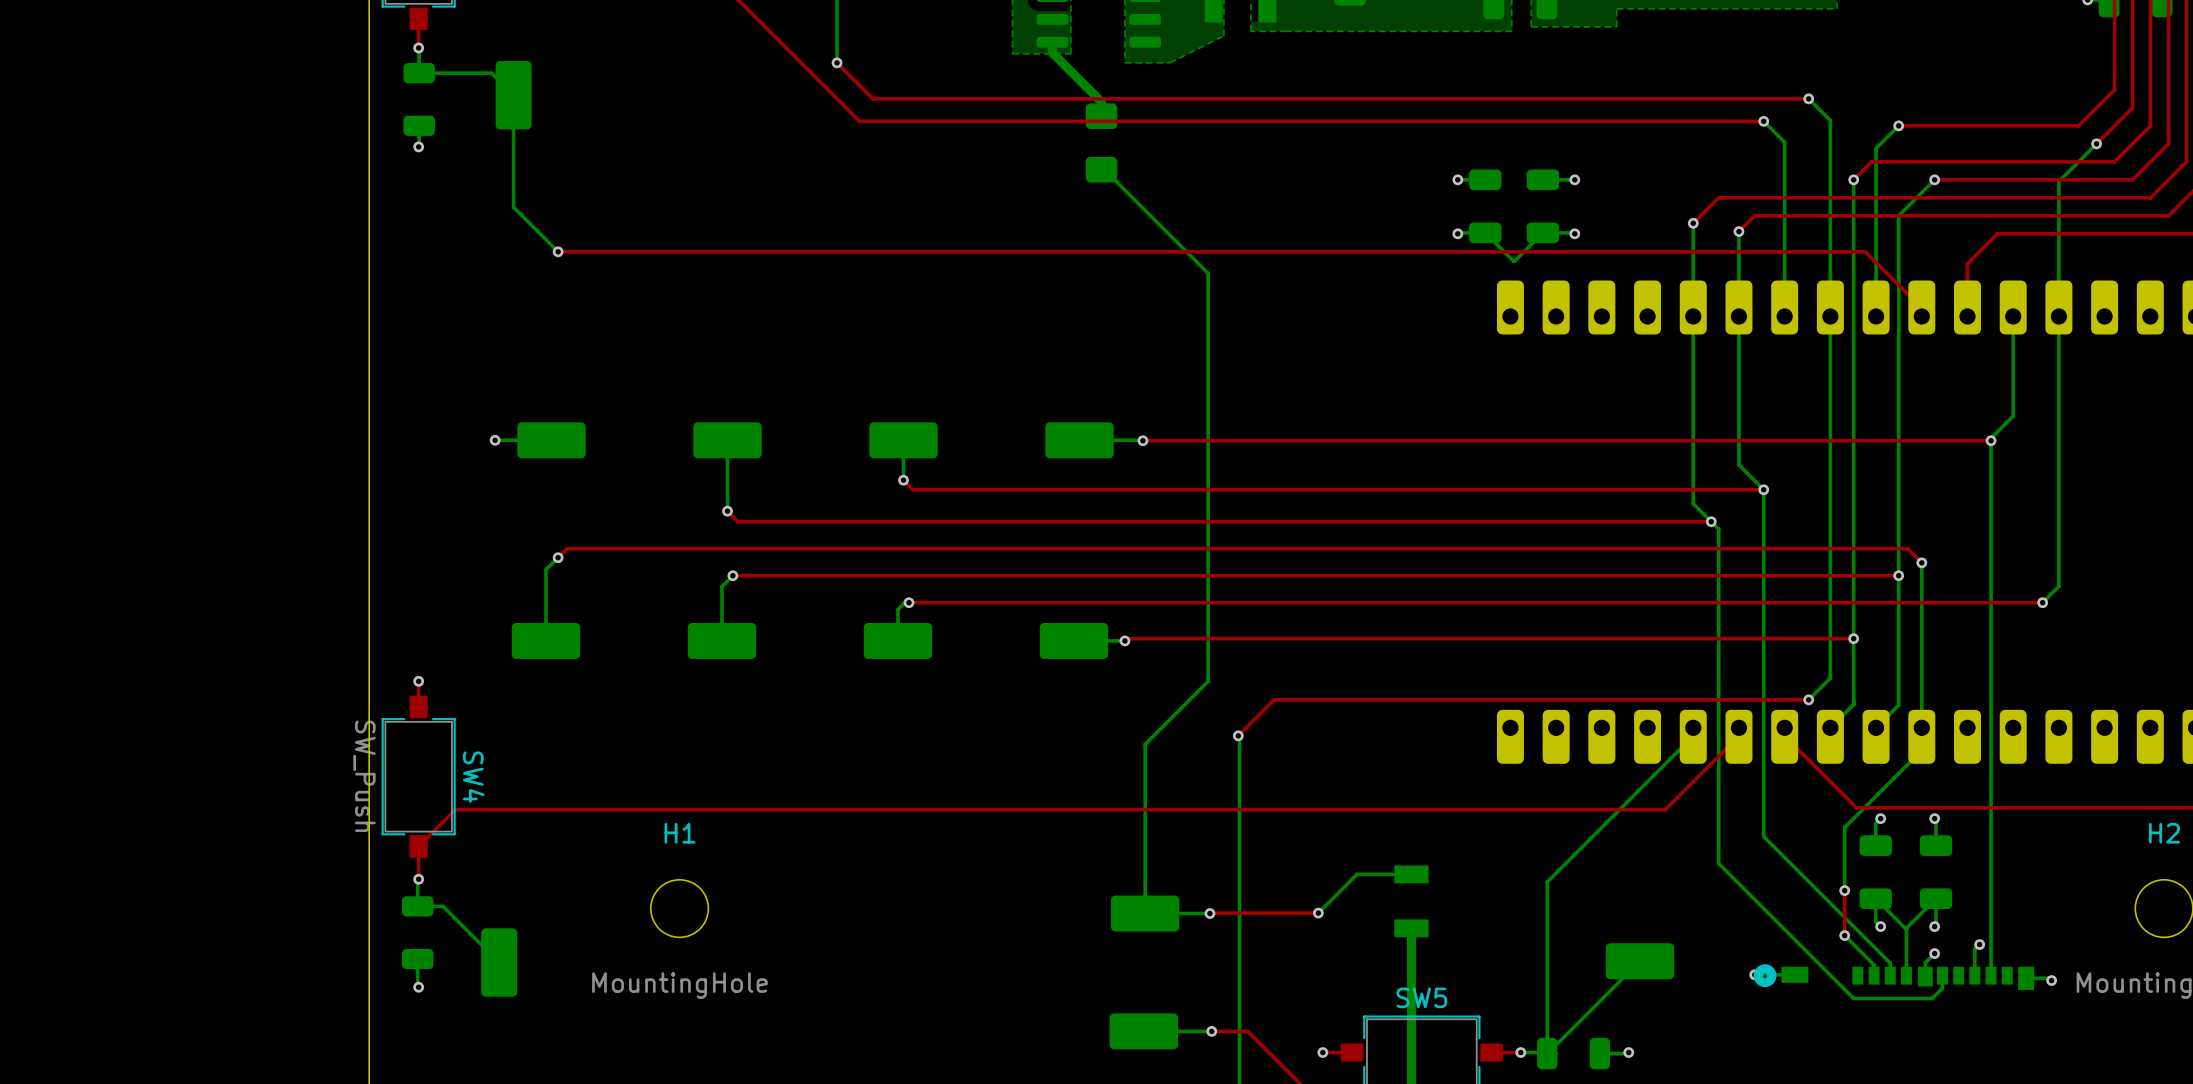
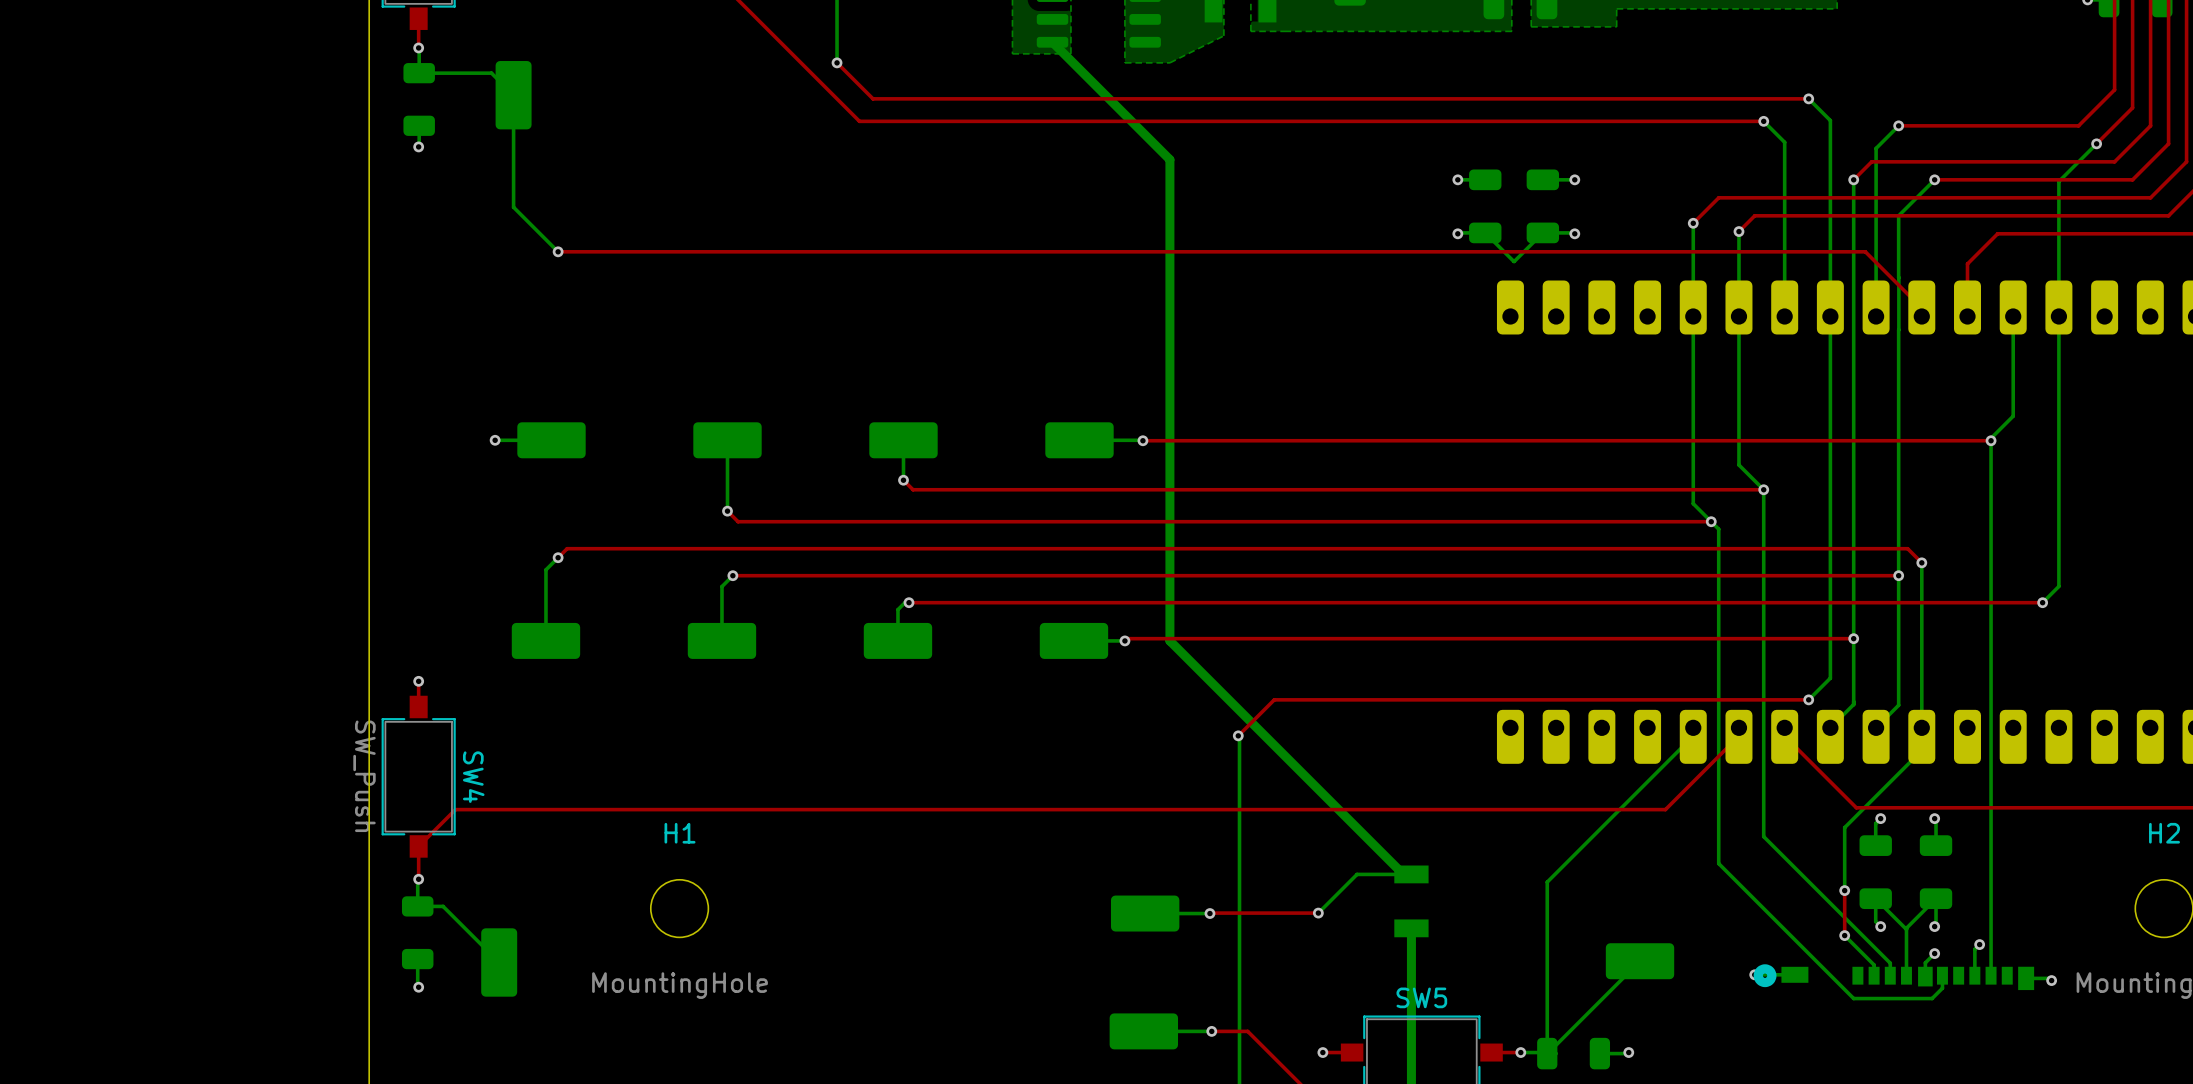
bottom track: (1052, 42) (1052, 52) (1101, 102) (1101, 116) -> (1052, 42) (1169, 159) (1169, 640) (1403, 874)
part: (1101, 142) -> none
bottom track: (1101, 169) (1104, 169) (1208, 273) (1208, 681) (1145, 744) (1145, 913) -> none

